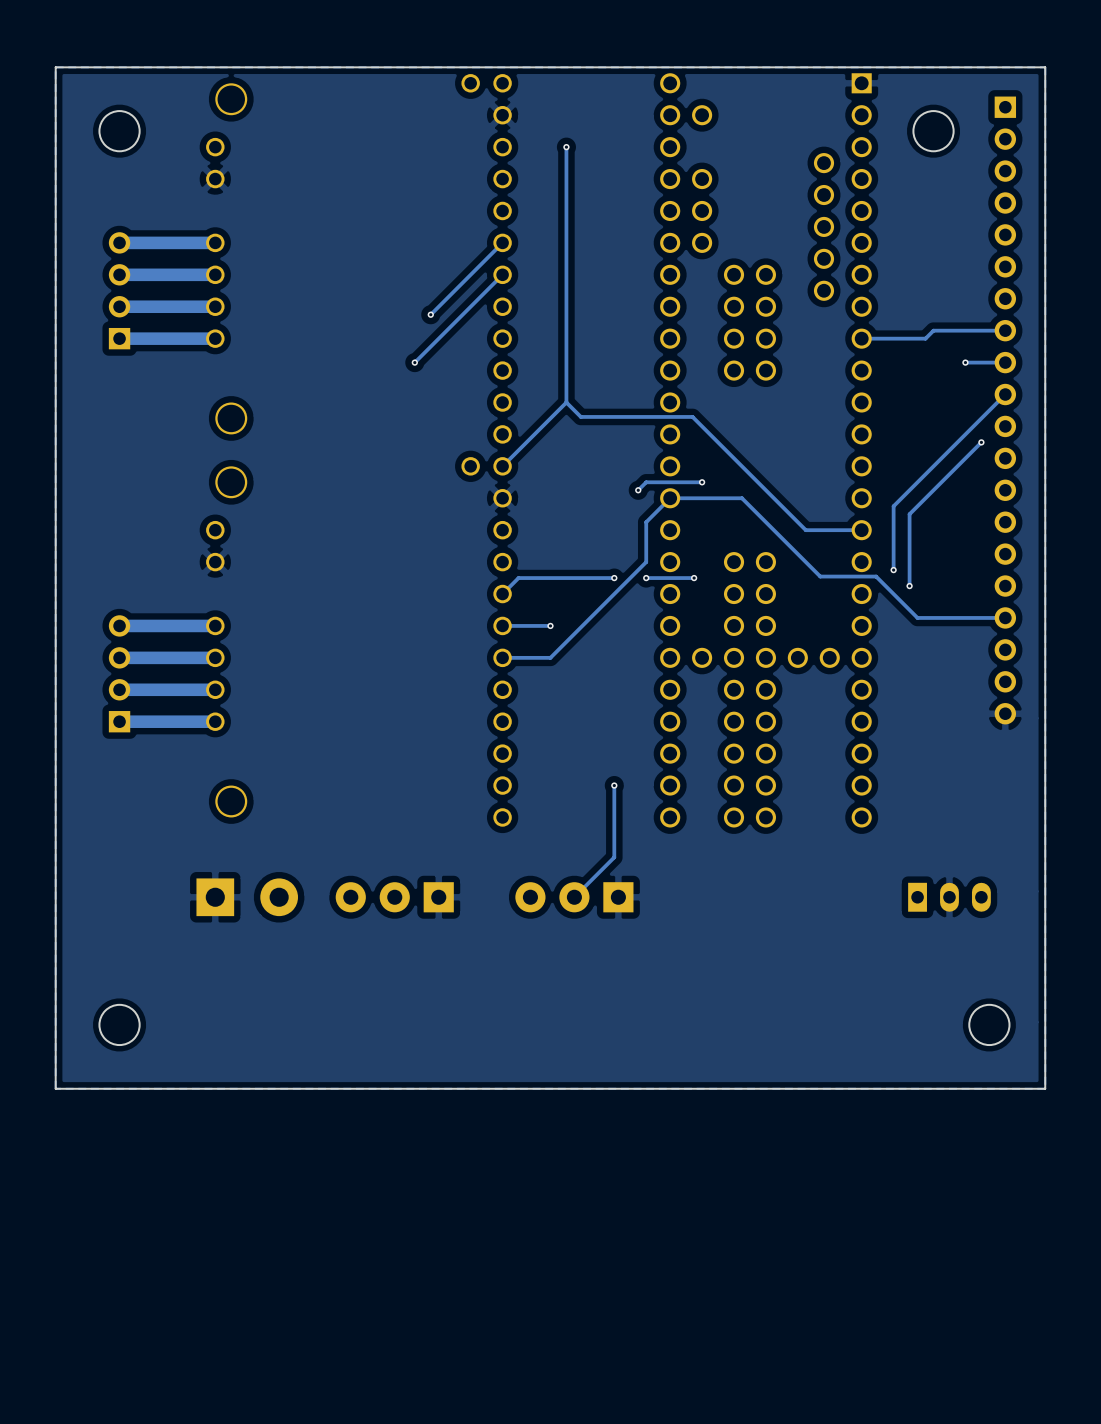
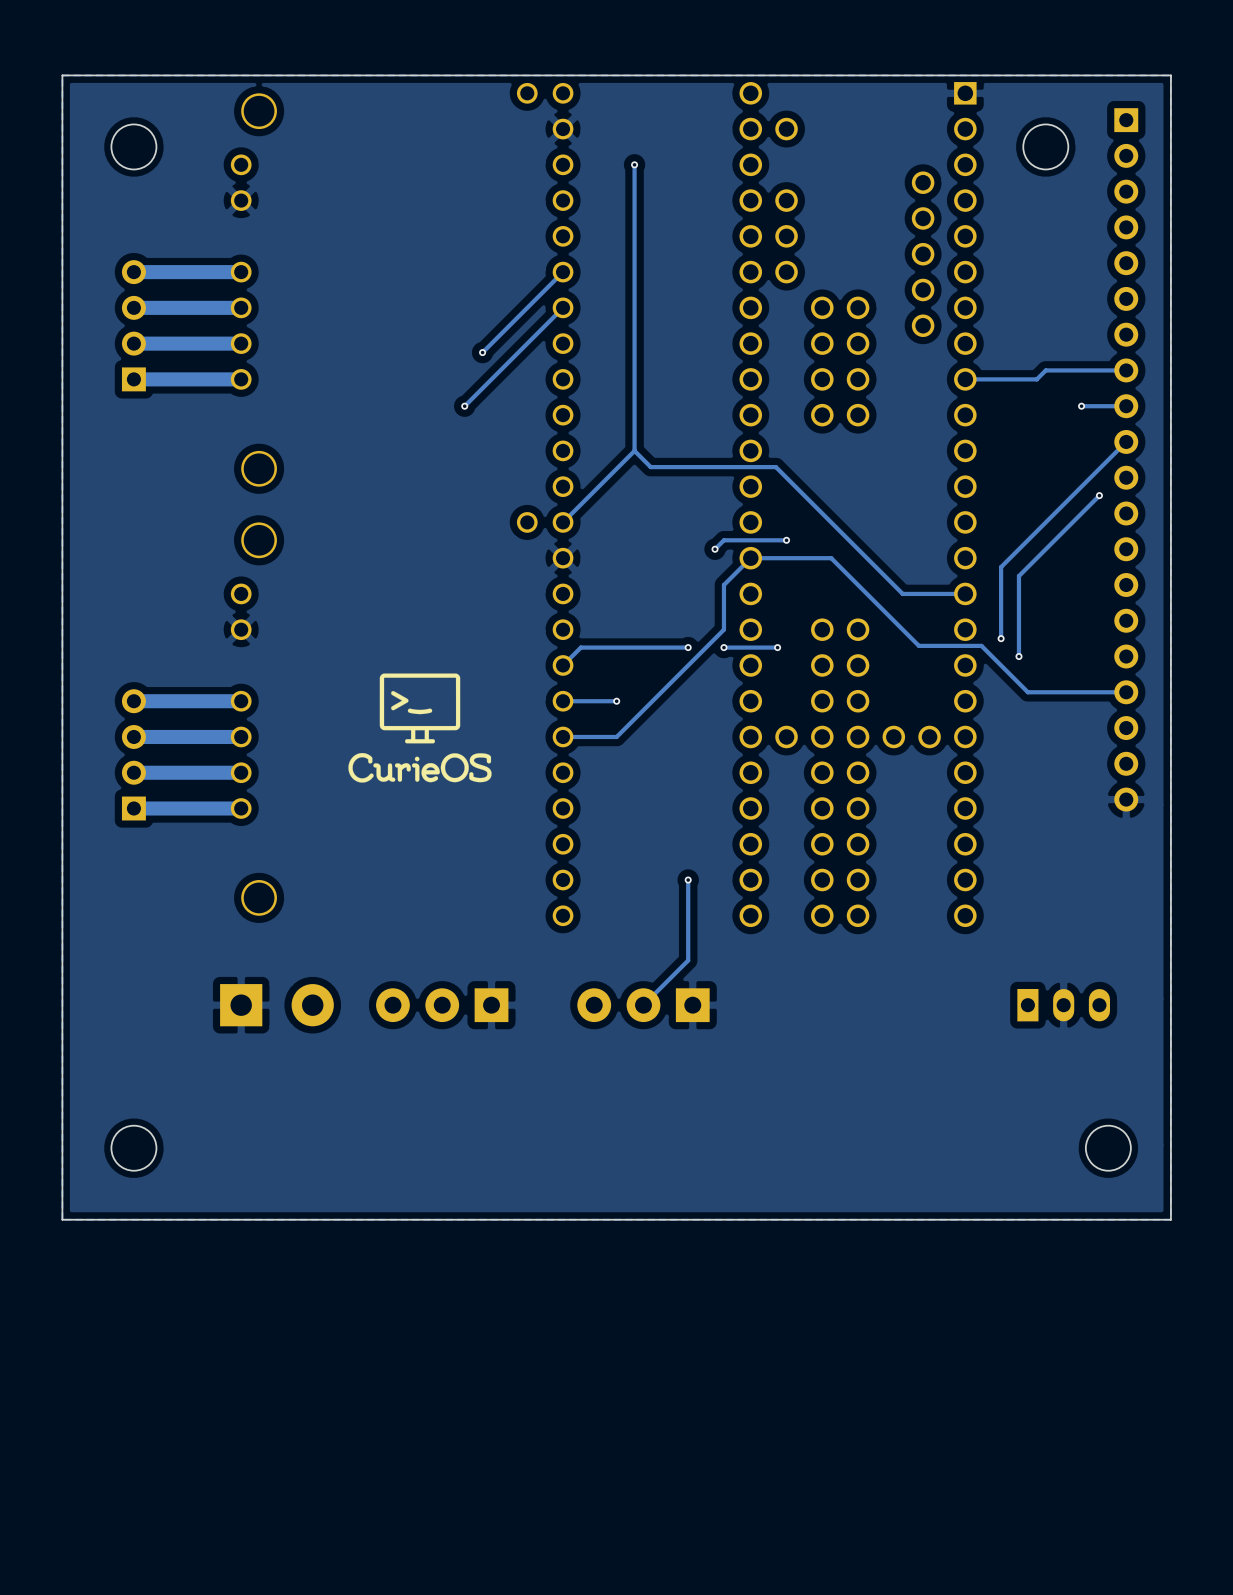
drawing: none -> [348, 673, 492, 783]

